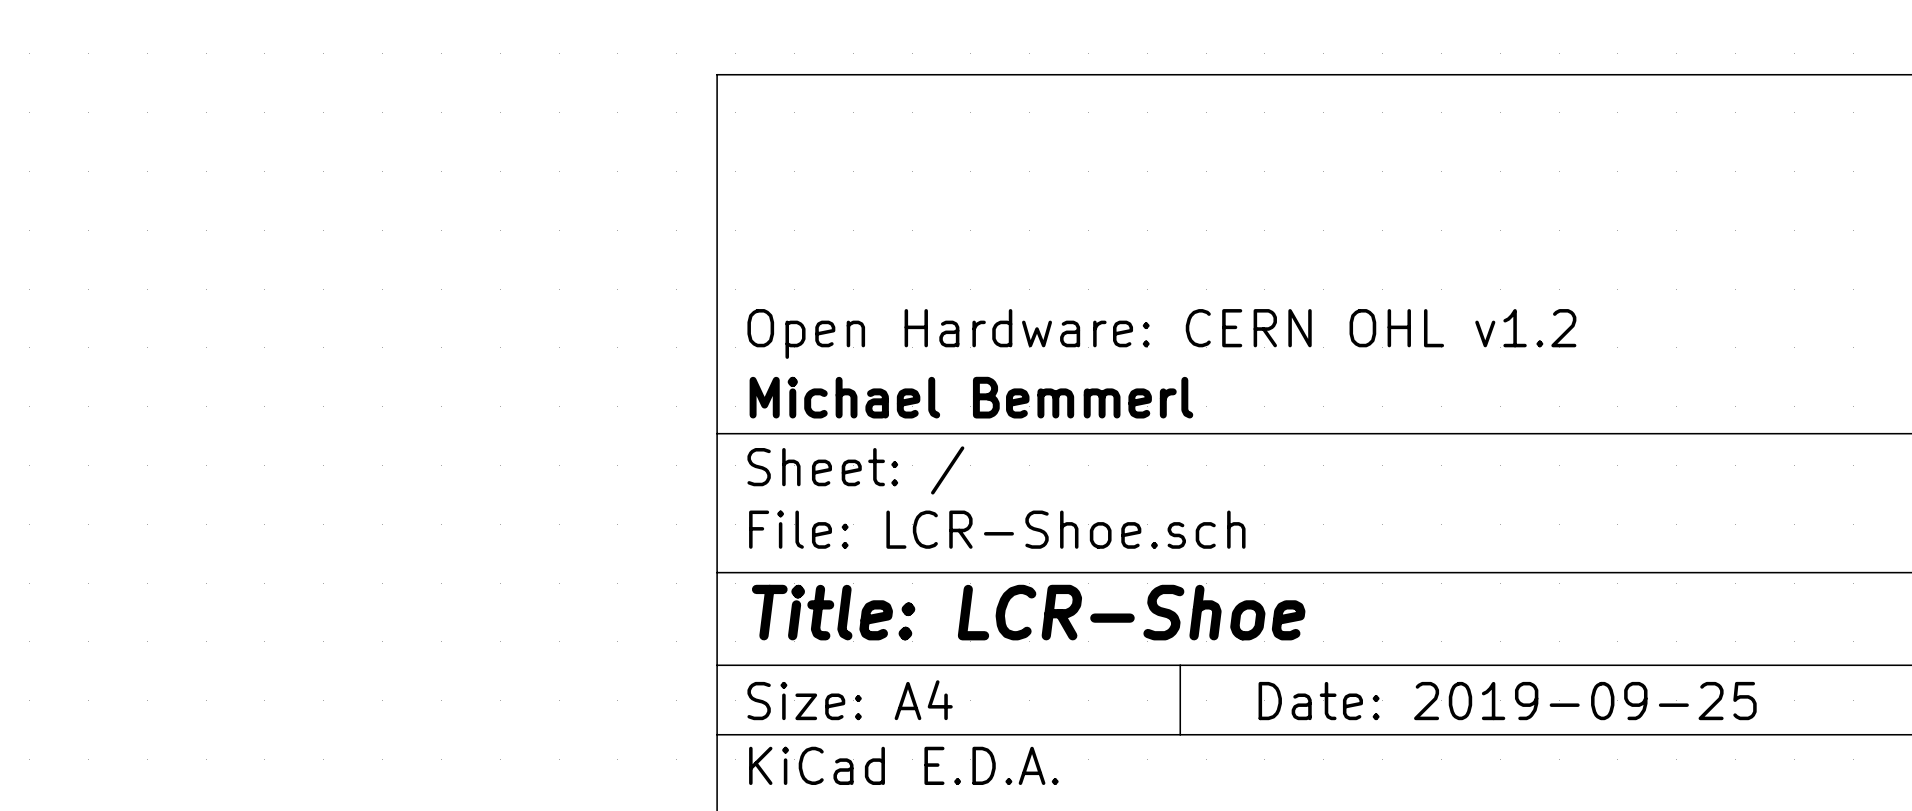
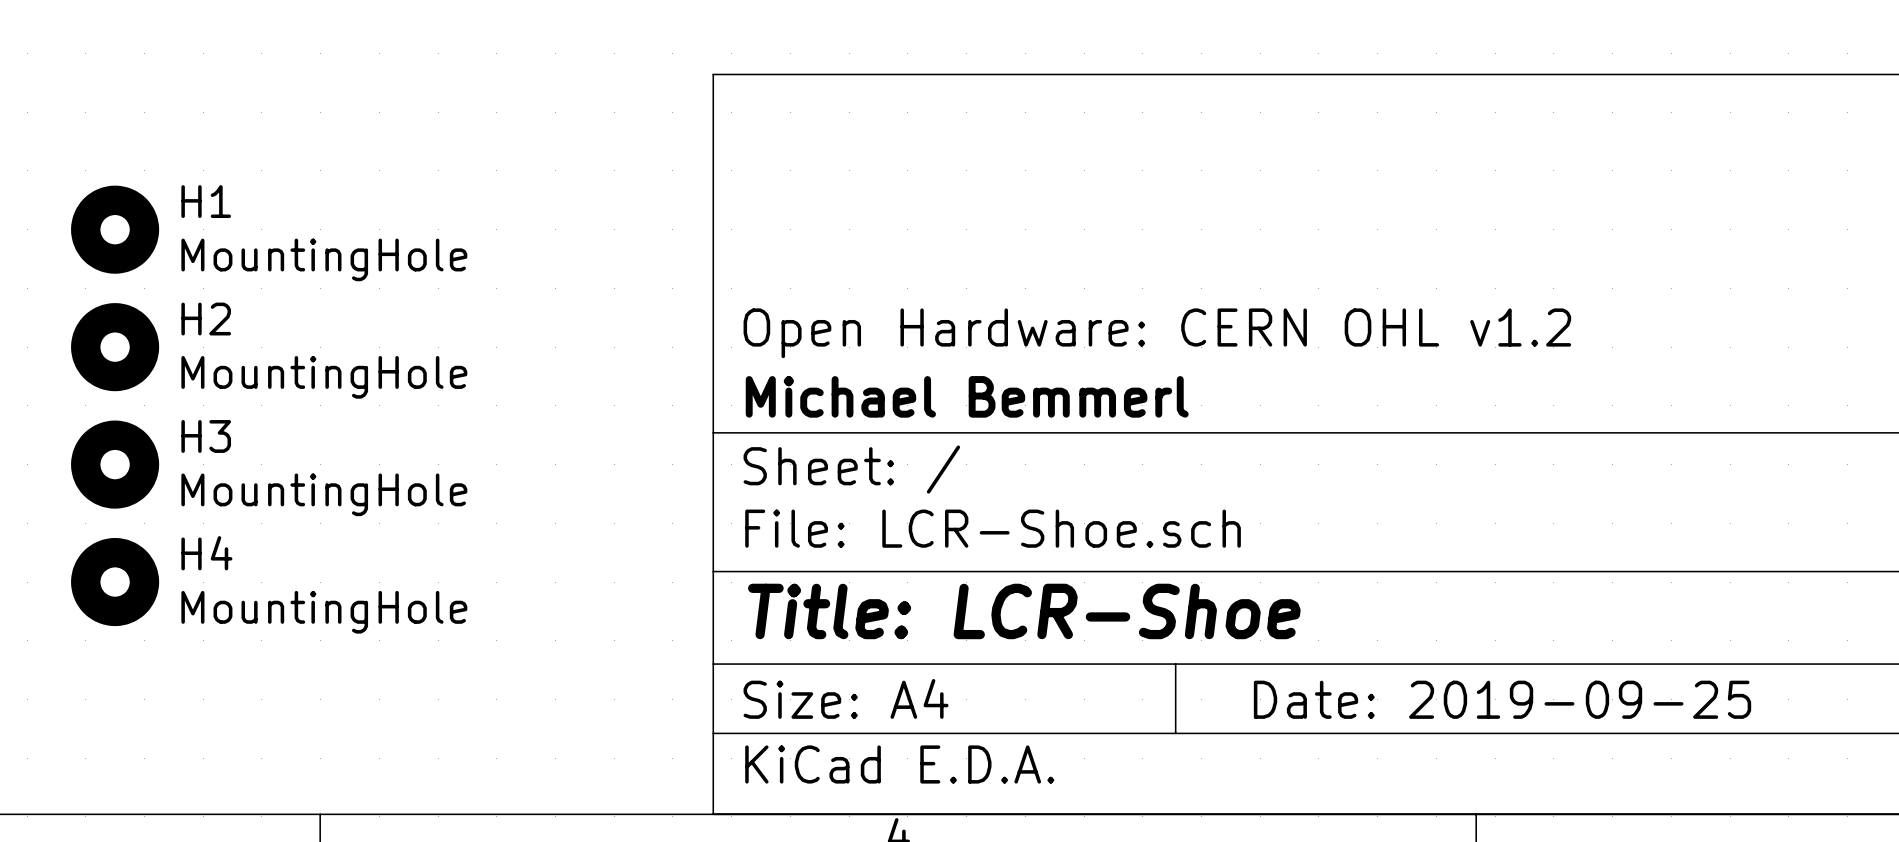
H1: none -> MountingHole (115, 229)
H2: none -> MountingHole (115, 347)
H3: none -> MountingHole (115, 464)
H4: none -> MountingHole (115, 582)

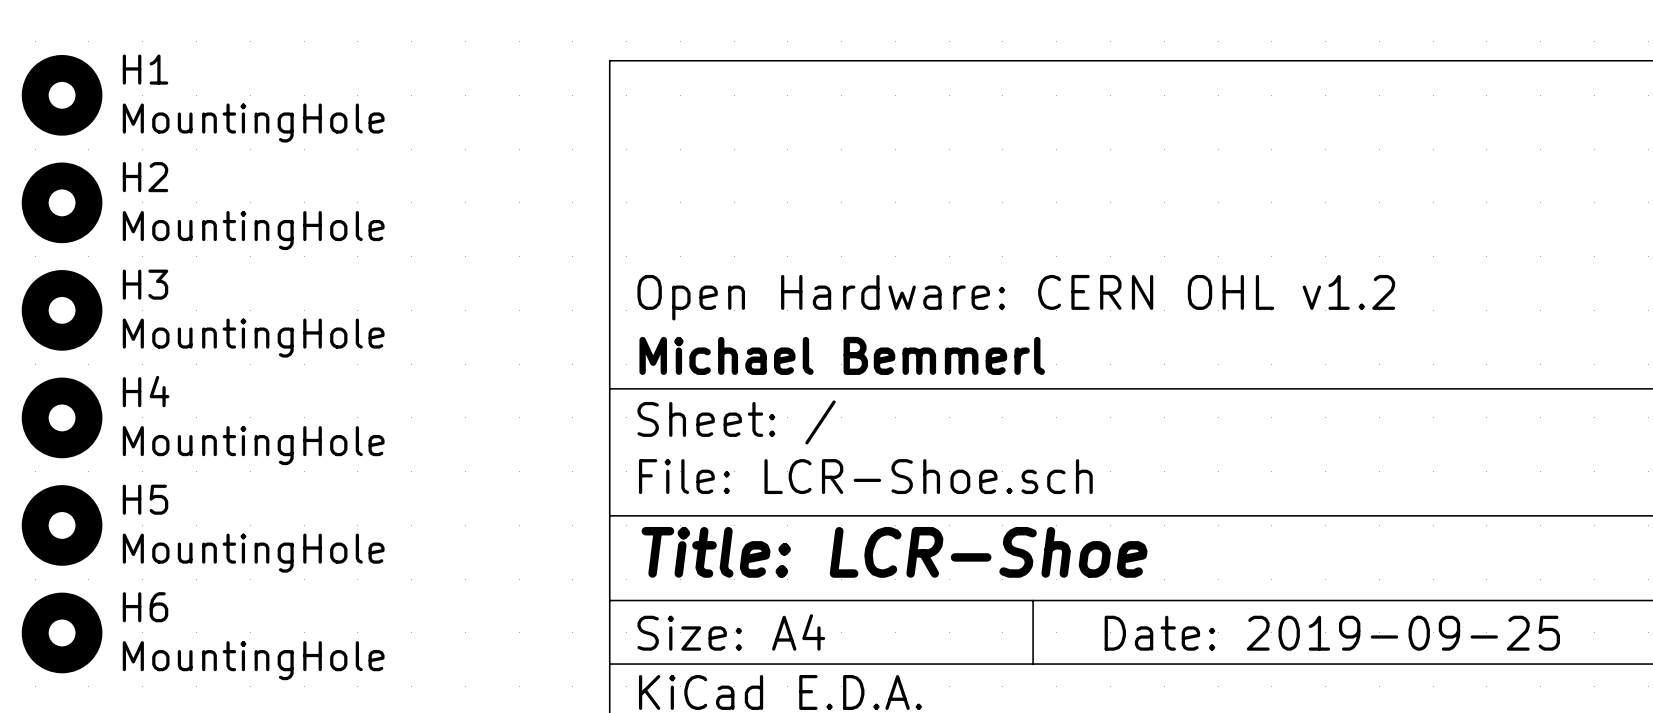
H1: none -> MountingHole (62, 95)
H1 name: H1 (206, 201) -> H2 (145, 177)
H2 name: H2 (206, 319) -> H3 (145, 284)
H3 name: H3 (206, 436) -> H4 (146, 391)
H4 name: H4 (206, 553) -> H5 (145, 499)
H6: none -> MountingHole (62, 632)

